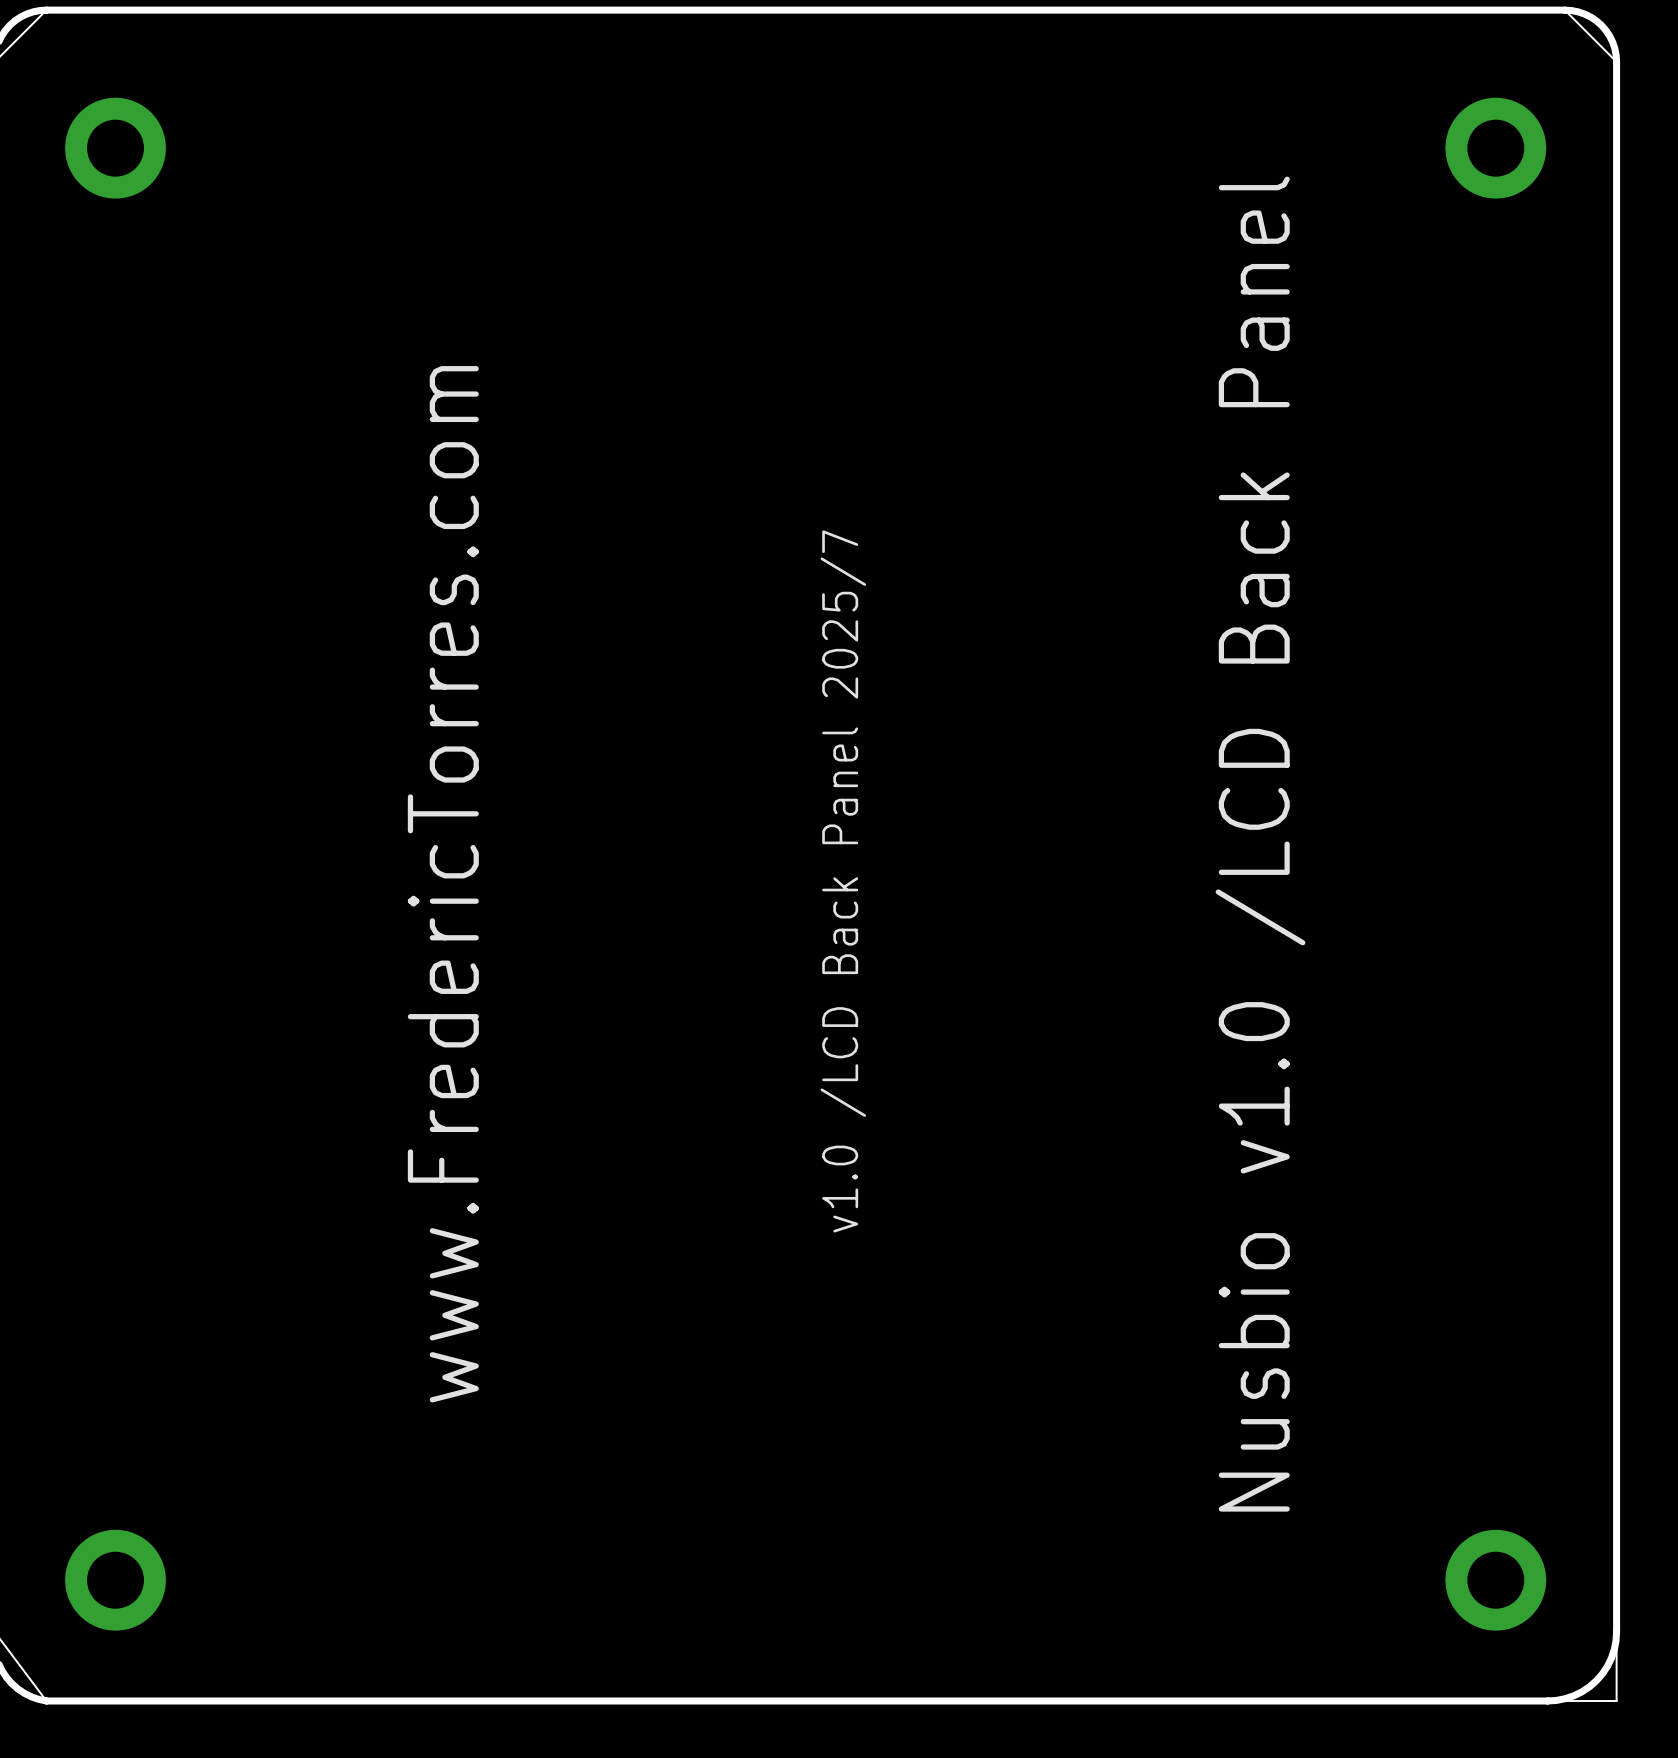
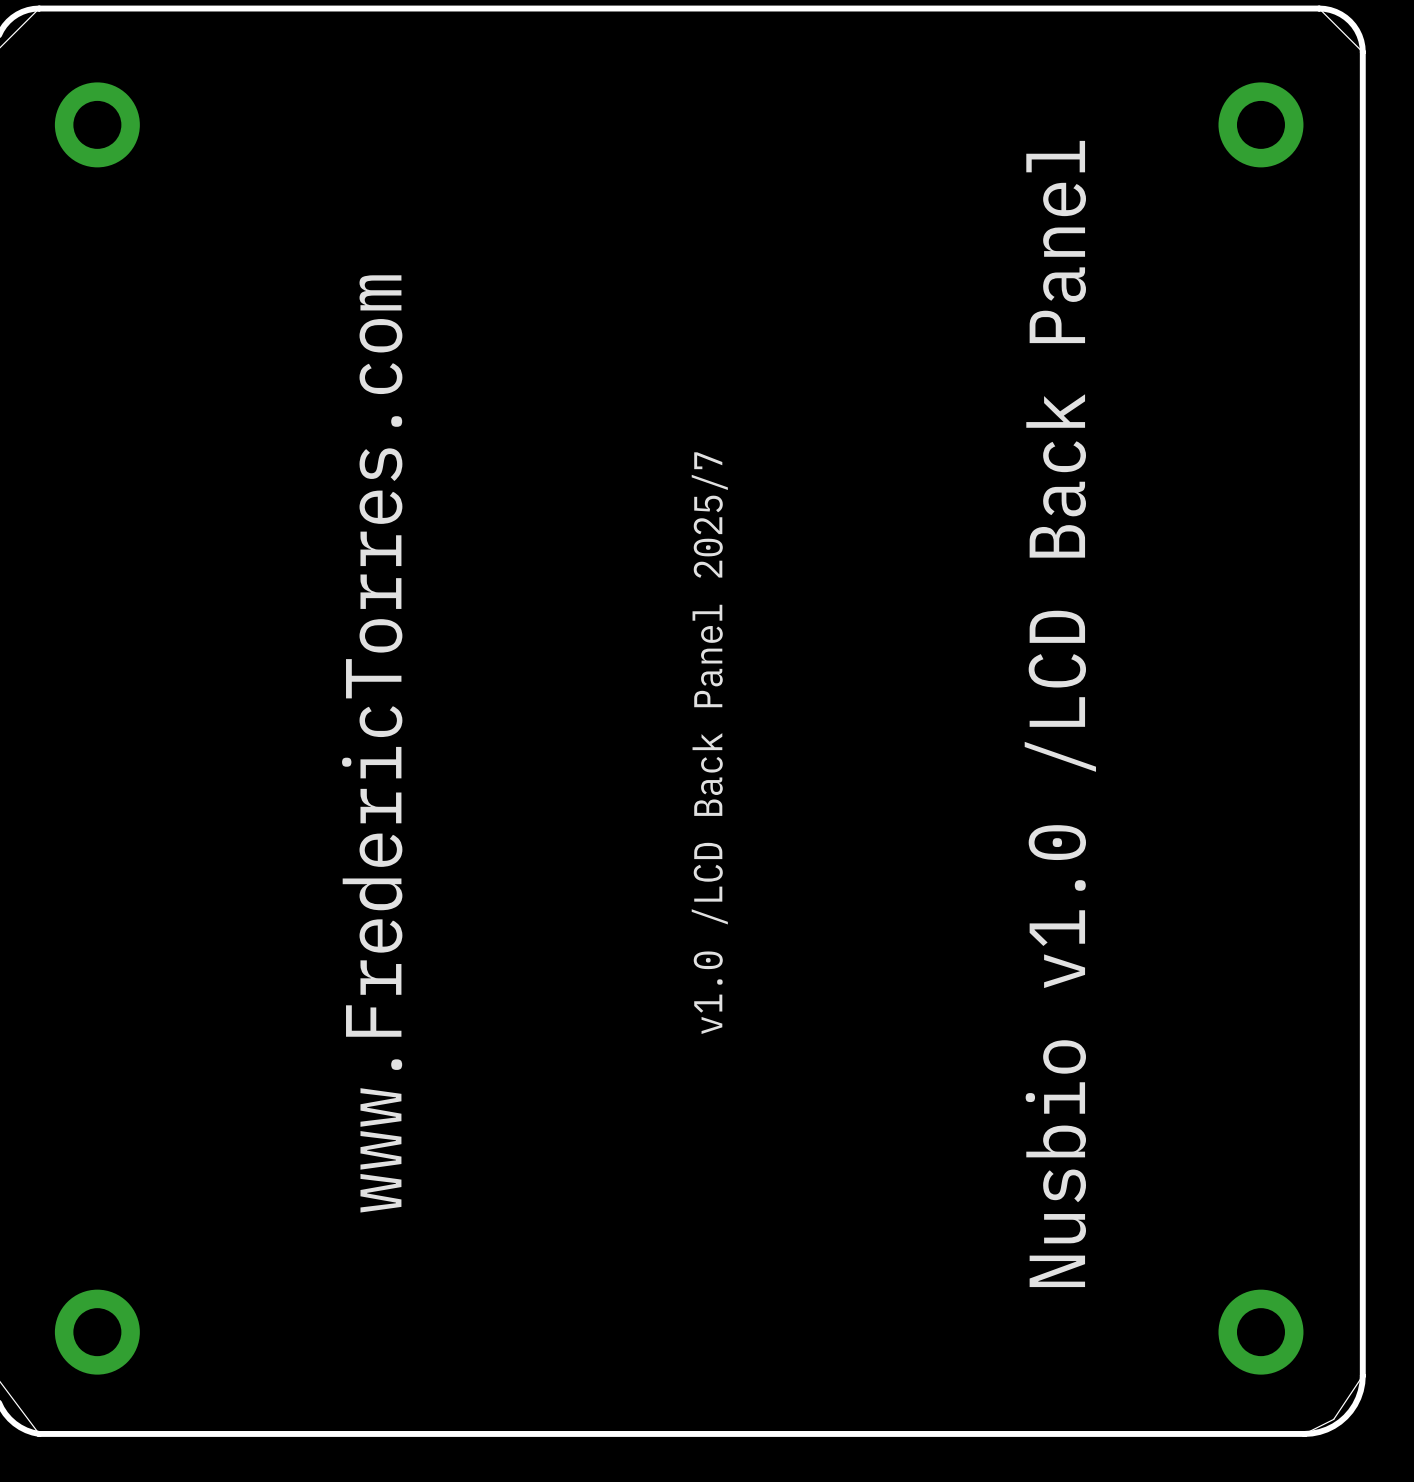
board edge: (1616, 1631) (1616, 1701) (1547, 1701) -> (1362, 1375) (1333, 1419) (1304, 1433)

